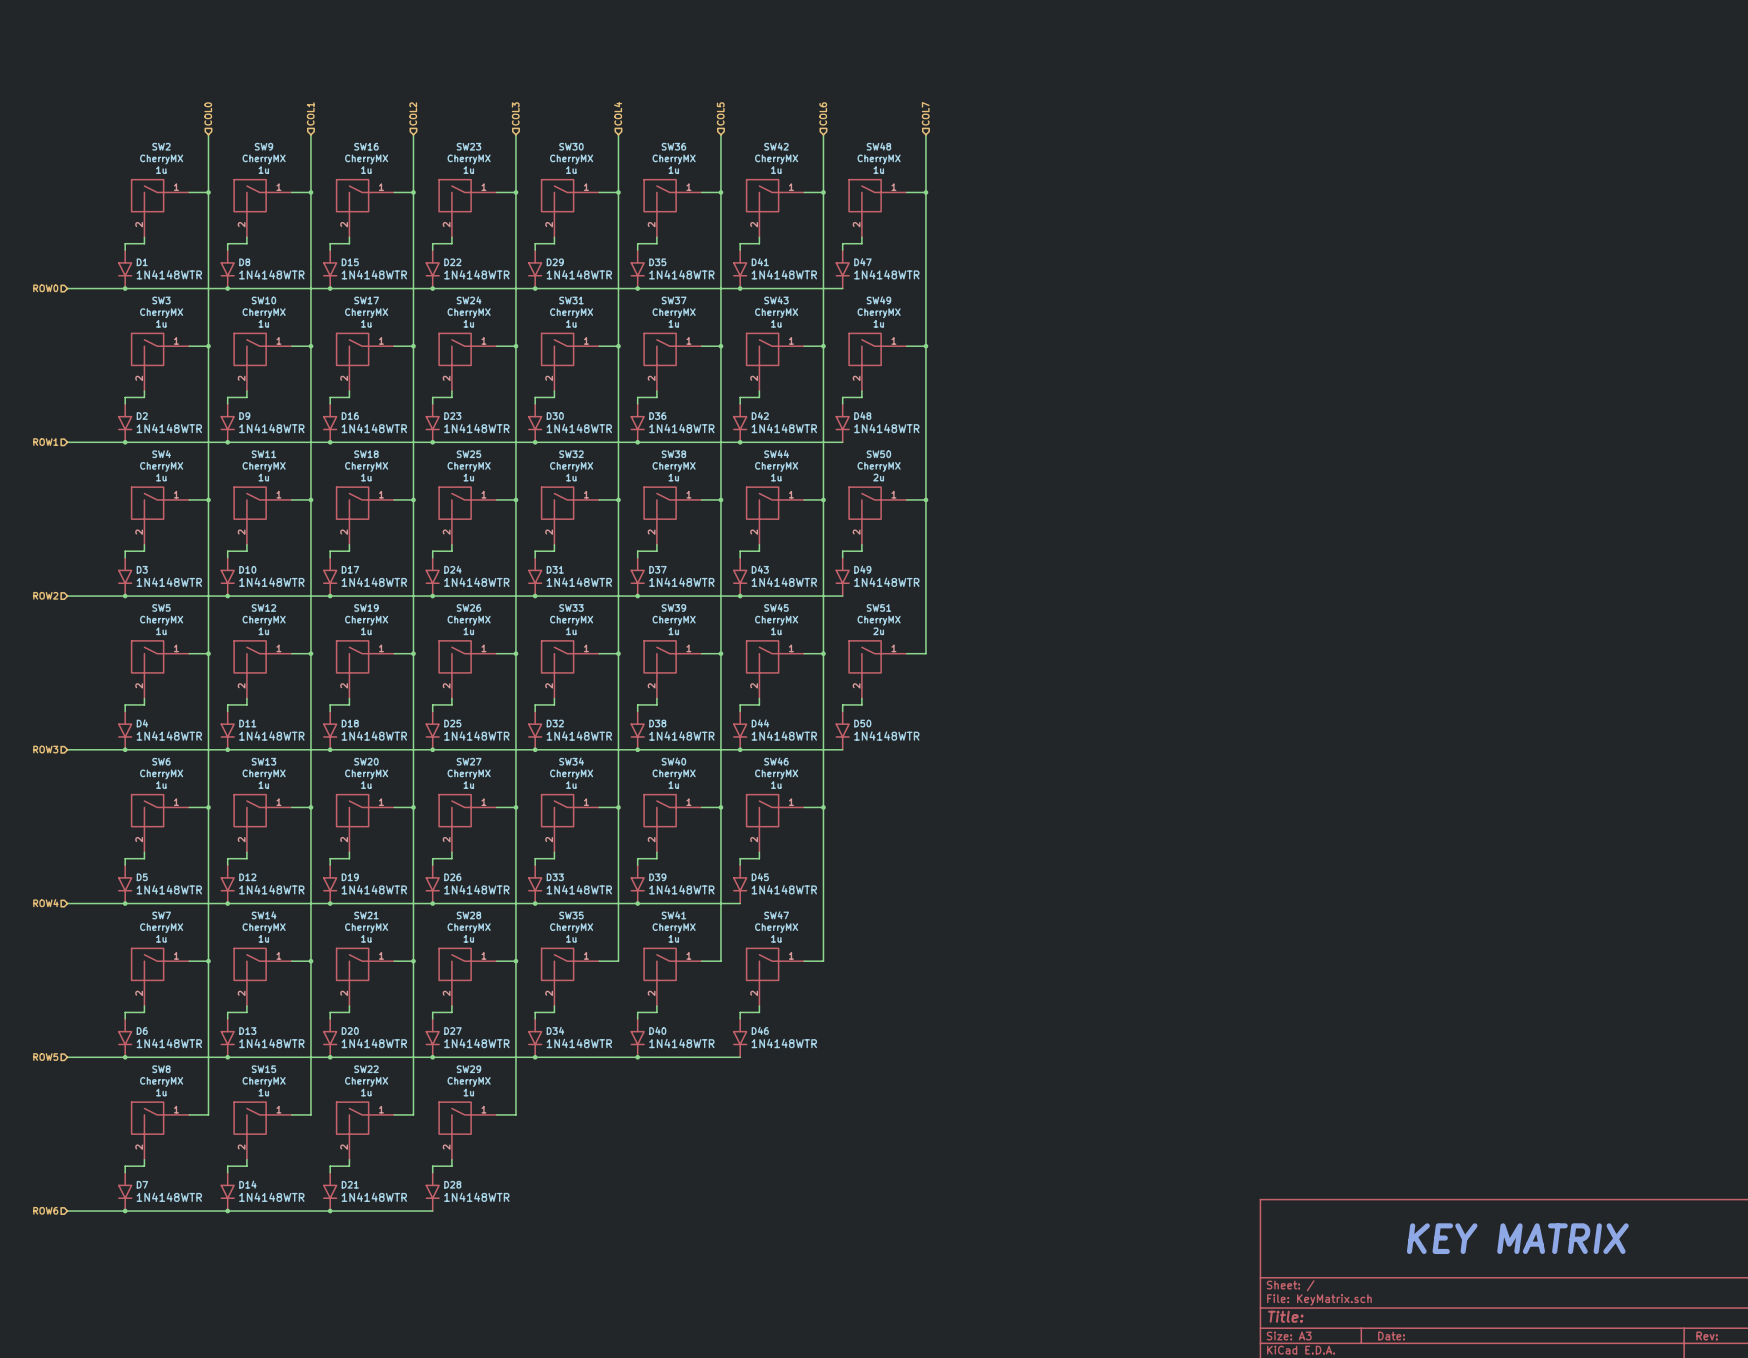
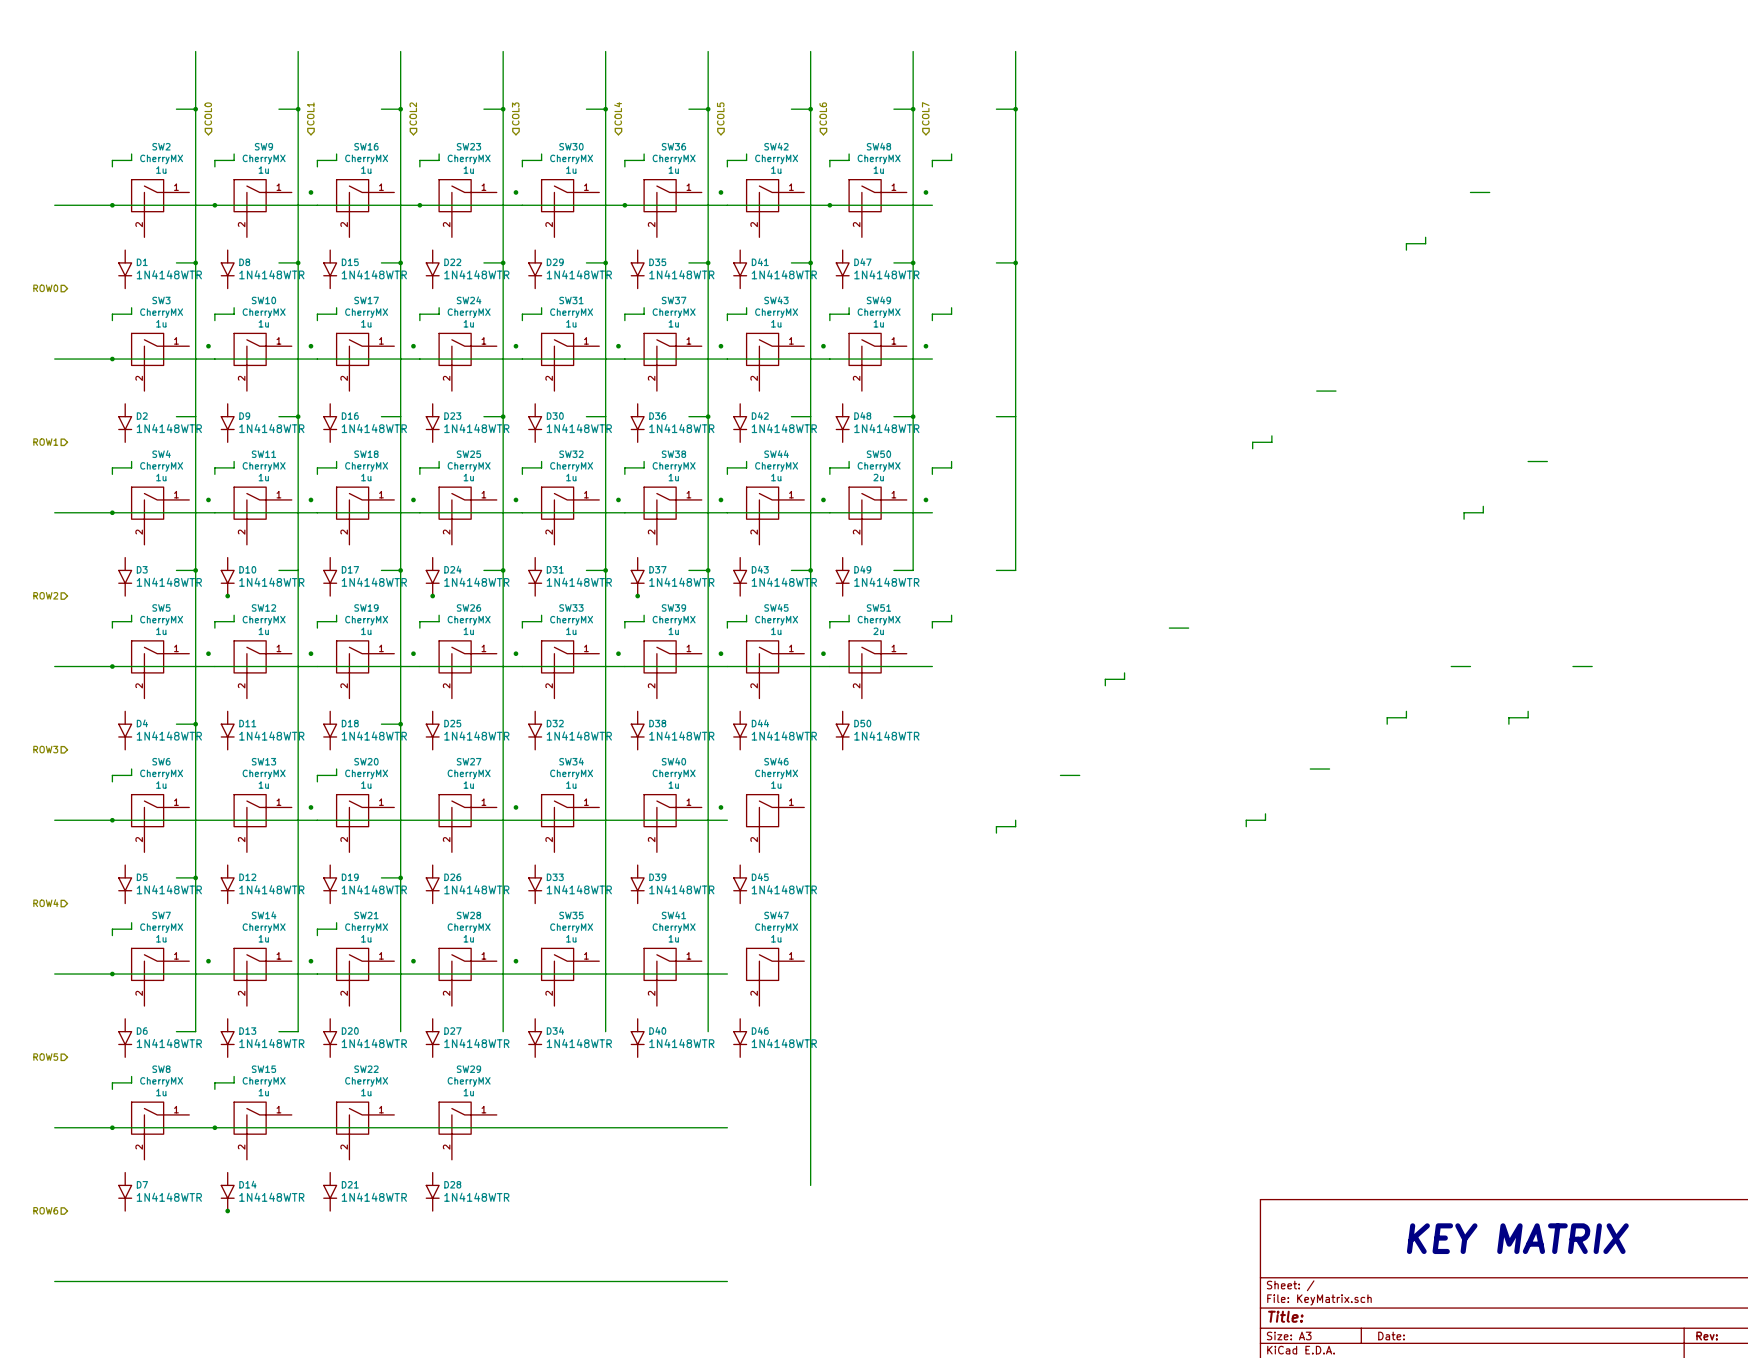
wire: none -> (400, 51) (400, 1031)
wire: none -> (503, 51) (503, 1031)
wire: none -> (605, 51) (605, 1031)
wire: none -> (708, 51) (708, 1031)
wire: none -> (810, 51) (810, 1185)
wire: none -> (1015, 51) (1015, 570) (996, 570)
junction: none -> (195, 109)
junction: none -> (298, 109)
junction: none -> (400, 109)
junction: none -> (503, 109)
junction: none -> (605, 109)
junction: none -> (708, 109)
junction: none -> (810, 109)
junction: none -> (913, 109)
wire: none -> (996, 109) (1015, 109)
junction: none -> (1015, 109)
wire: (208, 134) (208, 1114) (189, 1114) -> (195, 51) (195, 1031) (176, 1031)
wire: (310, 134) (310, 1114) (291, 1114) -> (298, 51) (298, 1031) (278, 1031)
wire: (413, 134) (413, 1114) (394, 1114) -> none
wire: (515, 134) (515, 1114) (496, 1114) -> none
wire: (618, 134) (618, 961) (599, 961) -> none
wire: (720, 134) (720, 961) (701, 961) -> none
wire: (823, 134) (823, 961) (804, 961) -> none
wire: (925, 134) (925, 653) (906, 653) -> (913, 51) (913, 570) (893, 570)
wire: none -> (951, 154) (951, 160) (932, 160) (932, 166)
wire: (189, 192) (208, 192) -> (176, 109) (195, 109)
junction position: (208, 192) -> (214, 205)
wire: (291, 192) (310, 192) -> (278, 109) (298, 109)
wire: (394, 192) (413, 192) -> (381, 109) (400, 109)
junction position: (413, 192) -> (419, 205)
wire: (496, 192) (515, 192) -> (483, 109) (503, 109)
wire: (599, 192) (618, 192) -> (586, 109) (605, 109)
junction position: (618, 192) -> (624, 205)
wire: (701, 192) (720, 192) -> (688, 109) (708, 109)
wire: (804, 192) (823, 192) -> (791, 109) (810, 109)
junction position: (823, 192) -> (829, 205)
wire: (906, 192) (925, 192) -> (893, 109) (913, 109)
wire: none -> (1470, 192) (1489, 192)
wire: none -> (54, 205) (932, 205)
junction: none -> (112, 205)
wire: (144, 237) (144, 243) (125, 243) (125, 250) -> (131, 154) (131, 160) (112, 160) (112, 166)
wire: (246, 237) (246, 243) (227, 243) (227, 250) -> (234, 154) (234, 160) (214, 160) (214, 166)
wire: (349, 237) (349, 243) (330, 243) (330, 250) -> (336, 154) (336, 160) (317, 160) (317, 166)
wire: (451, 237) (451, 243) (432, 243) (432, 250) -> (439, 154) (439, 160) (419, 160) (419, 166)
wire: (554, 237) (554, 243) (535, 243) (535, 250) -> (541, 154) (541, 160) (522, 160) (522, 166)
wire: (656, 237) (656, 243) (637, 243) (637, 250) -> (644, 154) (644, 160) (624, 160) (624, 166)
wire: (759, 237) (759, 243) (740, 243) (740, 250) -> (746, 154) (746, 160) (727, 160) (727, 166)
wire: (861, 237) (861, 243) (842, 243) (842, 250) -> (849, 154) (849, 160) (829, 160) (829, 166)
wire: none -> (1425, 237) (1425, 243) (1406, 243) (1406, 250)
junction: none -> (195, 262)
junction: none -> (298, 262)
junction: none -> (400, 262)
junction: none -> (503, 262)
junction: none -> (605, 262)
junction: none -> (708, 262)
junction: none -> (810, 262)
junction: none -> (913, 262)
wire: none -> (996, 262) (1015, 262)
junction: none -> (1015, 262)
wire: (67, 288) (842, 288) -> none
junction: (125, 288) -> none
junction: (227, 288) -> none
junction: (330, 288) -> none
junction: (432, 288) -> none
junction: (535, 288) -> none
junction: (637, 288) -> none
junction: (740, 288) -> none
wire: none -> (951, 307) (951, 314) (932, 314) (932, 320)
wire: (189, 346) (208, 346) -> (176, 262) (195, 262)
wire: (291, 346) (310, 346) -> (278, 262) (298, 262)
wire: (394, 346) (413, 346) -> (381, 262) (400, 262)
wire: (496, 346) (515, 346) -> (483, 262) (503, 262)
wire: (599, 346) (618, 346) -> (586, 262) (605, 262)
wire: (701, 346) (720, 346) -> (688, 262) (708, 262)
wire: (804, 346) (823, 346) -> (791, 262) (810, 262)
wire: (906, 346) (925, 346) -> (893, 262) (913, 262)
wire: none -> (54, 359) (932, 359)
junction: none -> (112, 359)
wire: (144, 391) (144, 397) (125, 397) (125, 403) -> (131, 307) (131, 314) (112, 314) (112, 320)
wire: (246, 391) (246, 397) (227, 397) (227, 403) -> (234, 307) (234, 314) (214, 314) (214, 320)
wire: (349, 391) (349, 397) (330, 397) (330, 403) -> (336, 307) (336, 314) (317, 314) (317, 320)
wire: (451, 391) (451, 397) (432, 397) (432, 403) -> (439, 307) (439, 314) (419, 314) (419, 320)
wire: (554, 391) (554, 397) (535, 397) (535, 403) -> (541, 307) (541, 314) (522, 314) (522, 320)
wire: (656, 391) (656, 397) (637, 397) (637, 403) -> (644, 307) (644, 314) (624, 314) (624, 320)
wire: (759, 391) (759, 397) (740, 397) (740, 403) -> (746, 307) (746, 314) (727, 314) (727, 320)
wire: (861, 391) (861, 397) (842, 397) (842, 403) -> (849, 307) (849, 314) (829, 314) (829, 320)
wire: none -> (1316, 391) (1335, 391)
junction: none -> (298, 416)
junction: none -> (503, 416)
junction: none -> (708, 416)
junction: none -> (913, 416)
wire: none -> (996, 416) (1015, 416)
wire: none -> (1271, 435) (1271, 442) (1252, 442) (1252, 448)
wire: (67, 442) (842, 442) -> none
junction: (125, 442) -> none
junction: (227, 442) -> none
junction: (330, 442) -> none
junction: (432, 442) -> none
junction: (535, 442) -> none
junction: (637, 442) -> none
junction: (740, 442) -> none
wire: none -> (951, 461) (951, 467) (932, 467) (932, 474)
wire: none -> (1528, 461) (1547, 461)
wire: (189, 499) (208, 499) -> (176, 416) (195, 416)
wire: (291, 499) (310, 499) -> (278, 416) (298, 416)
wire: (394, 499) (413, 499) -> (381, 416) (400, 416)
wire: (496, 499) (515, 499) -> (483, 416) (503, 416)
wire: (599, 499) (618, 499) -> (586, 416) (605, 416)
wire: (701, 499) (720, 499) -> (688, 416) (708, 416)
wire: (804, 499) (823, 499) -> (791, 416) (810, 416)
wire: (906, 499) (925, 499) -> (893, 416) (913, 416)
wire: none -> (1483, 506) (1483, 512) (1464, 512) (1464, 519)
wire: none -> (54, 512) (932, 512)
junction: none -> (112, 512)
wire: (144, 544) (144, 551) (125, 551) (125, 557) -> (131, 461) (131, 467) (112, 467) (112, 474)
wire: (246, 544) (246, 551) (227, 551) (227, 557) -> (234, 461) (234, 467) (214, 467) (214, 474)
wire: (349, 544) (349, 551) (330, 551) (330, 557) -> (336, 461) (336, 467) (317, 467) (317, 474)
wire: (451, 544) (451, 551) (432, 551) (432, 557) -> (439, 461) (439, 467) (419, 467) (419, 474)
wire: (554, 544) (554, 551) (535, 551) (535, 557) -> (541, 461) (541, 467) (522, 467) (522, 474)
wire: (656, 544) (656, 551) (637, 551) (637, 557) -> (644, 461) (644, 467) (624, 467) (624, 474)
wire: (759, 544) (759, 551) (740, 551) (740, 557) -> (746, 461) (746, 467) (727, 467) (727, 474)
wire: (861, 544) (861, 551) (842, 551) (842, 557) -> (849, 461) (849, 467) (829, 467) (829, 474)
junction: none -> (195, 570)
junction: none -> (400, 570)
junction: none -> (503, 570)
junction: none -> (605, 570)
junction: none -> (708, 570)
junction: none -> (810, 570)
wire: (67, 596) (842, 596) -> none
junction: (125, 596) -> none
junction: (330, 596) -> none
junction: (535, 596) -> none
junction: (740, 596) -> none
wire: none -> (951, 615) (951, 621) (932, 621) (932, 628)
wire: none -> (1169, 628) (1188, 628)
wire: (189, 653) (208, 653) -> (176, 570) (195, 570)
wire: (291, 653) (310, 653) -> (278, 570) (298, 570)
wire: (394, 653) (413, 653) -> (381, 570) (400, 570)
wire: (496, 653) (515, 653) -> (483, 570) (503, 570)
wire: (599, 653) (618, 653) -> (586, 570) (605, 570)
wire: (701, 653) (720, 653) -> (688, 570) (708, 570)
wire: (804, 653) (823, 653) -> (791, 570) (810, 570)
wire: none -> (54, 666) (932, 666)
junction: none -> (112, 666)
wire: none -> (1451, 666) (1470, 666)
wire: none -> (1572, 666) (1592, 666)
wire: none -> (1124, 672) (1124, 679) (1105, 679) (1105, 685)
wire: (144, 698) (144, 704) (125, 704) (125, 711) -> (131, 615) (131, 621) (112, 621) (112, 628)
wire: (246, 698) (246, 704) (227, 704) (227, 711) -> (234, 615) (234, 621) (214, 621) (214, 628)
wire: (349, 698) (349, 704) (330, 704) (330, 711) -> (336, 615) (336, 621) (317, 621) (317, 628)
wire: (451, 698) (451, 704) (432, 704) (432, 711) -> (439, 615) (439, 621) (419, 621) (419, 628)
wire: (554, 698) (554, 704) (535, 704) (535, 711) -> (541, 615) (541, 621) (522, 621) (522, 628)
wire: (656, 698) (656, 704) (637, 704) (637, 711) -> (644, 615) (644, 621) (624, 621) (624, 628)
wire: (759, 698) (759, 704) (740, 704) (740, 711) -> (746, 615) (746, 621) (727, 621) (727, 628)
wire: (861, 698) (861, 704) (842, 704) (842, 711) -> (849, 615) (849, 621) (829, 621) (829, 628)
wire: none -> (1406, 711) (1406, 717) (1387, 717) (1387, 724)
wire: none -> (1528, 711) (1528, 717) (1508, 717) (1508, 724)
junction: none -> (195, 724)
junction: none -> (400, 724)
wire: (67, 749) (842, 749) -> none
junction: (125, 749) -> none
junction: (227, 749) -> none
junction: (330, 749) -> none
junction: (432, 749) -> none
junction: (535, 749) -> none
junction: (637, 749) -> none
junction: (740, 749) -> none
wire: none -> (1310, 769) (1329, 769)
wire: none -> (1060, 775) (1079, 775)
wire: (189, 807) (208, 807) -> (176, 724) (195, 724)
junction: (208, 807) -> none
wire: (291, 807) (310, 807) -> none
wire: (394, 807) (413, 807) -> (381, 724) (400, 724)
junction: (413, 807) -> none
wire: (496, 807) (515, 807) -> none
wire: (599, 807) (618, 807) -> none
junction: (618, 807) -> none
wire: (701, 807) (720, 807) -> none
wire: (804, 807) (823, 807) -> none
junction: (823, 807) -> none
wire: none -> (1265, 813) (1265, 820) (1246, 820) (1246, 826)
junction: none -> (112, 820)
wire: none -> (1015, 820) (1015, 826) (996, 826) (996, 833)
wire: (144, 852) (144, 858) (125, 858) (125, 865) -> (131, 769) (131, 775) (112, 775) (112, 781)
wire: (246, 852) (246, 858) (227, 858) (227, 865) -> none
wire: (349, 852) (349, 858) (330, 858) (330, 865) -> (336, 769) (336, 775) (317, 775) (317, 781)
wire: (451, 852) (451, 858) (432, 858) (432, 865) -> none
wire: (554, 852) (554, 858) (535, 858) (535, 865) -> none
wire: (656, 852) (656, 858) (637, 858) (637, 865) -> none
wire: (759, 852) (759, 858) (740, 858) (740, 865) -> none
junction: none -> (195, 877)
junction: none -> (400, 877)
wire: (67, 903) (740, 903) -> (54, 820) (727, 820)
junction: (125, 903) -> none
junction: (227, 903) -> none
junction: (330, 903) -> none
junction: (432, 903) -> none
junction: (535, 903) -> none
junction: (637, 903) -> none
wire: (189, 961) (208, 961) -> (176, 877) (195, 877)
wire: (291, 961) (310, 961) -> none
wire: (394, 961) (413, 961) -> (381, 877) (400, 877)
wire: (496, 961) (515, 961) -> none
junction: none -> (112, 974)
wire: (144, 1006) (144, 1012) (125, 1012) (125, 1018) -> (131, 922) (131, 929) (112, 929) (112, 935)
wire: (246, 1006) (246, 1012) (227, 1012) (227, 1018) -> none
wire: (349, 1006) (349, 1012) (330, 1012) (330, 1018) -> (336, 922) (336, 929) (317, 929) (317, 935)
wire: (451, 1006) (451, 1012) (432, 1012) (432, 1018) -> none
wire: (554, 1006) (554, 1012) (535, 1012) (535, 1018) -> none
wire: (656, 1006) (656, 1012) (637, 1012) (637, 1018) -> none
wire: (759, 1006) (759, 1012) (740, 1012) (740, 1018) -> none
wire: (67, 1057) (740, 1057) -> (54, 974) (727, 974)
junction: (125, 1057) -> none
junction: (227, 1057) -> none
junction: (330, 1057) -> none
junction: (432, 1057) -> none
junction: (535, 1057) -> none
junction: (637, 1057) -> none
wire: none -> (54, 1127) (727, 1127)
junction: none -> (112, 1127)
junction: none -> (214, 1127)
wire: (144, 1159) (144, 1166) (125, 1166) (125, 1172) -> (131, 1076) (131, 1082) (112, 1082) (112, 1089)
wire: (246, 1159) (246, 1166) (227, 1166) (227, 1172) -> (234, 1076) (234, 1082) (214, 1082) (214, 1089)
wire: (349, 1159) (349, 1166) (330, 1166) (330, 1172) -> none
wire: (451, 1159) (451, 1166) (432, 1166) (432, 1172) -> none
wire: (67, 1211) (432, 1211) -> none
junction: (125, 1211) -> none
junction: (330, 1211) -> none
wire: none -> (54, 1281) (727, 1281)

